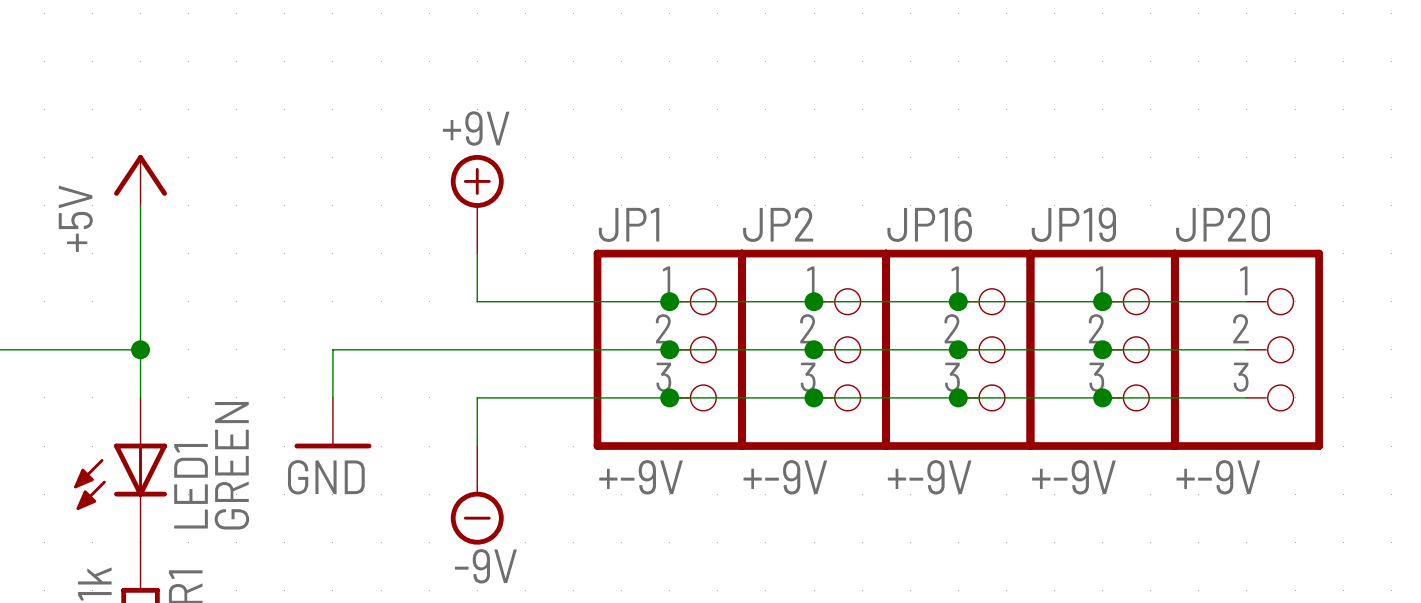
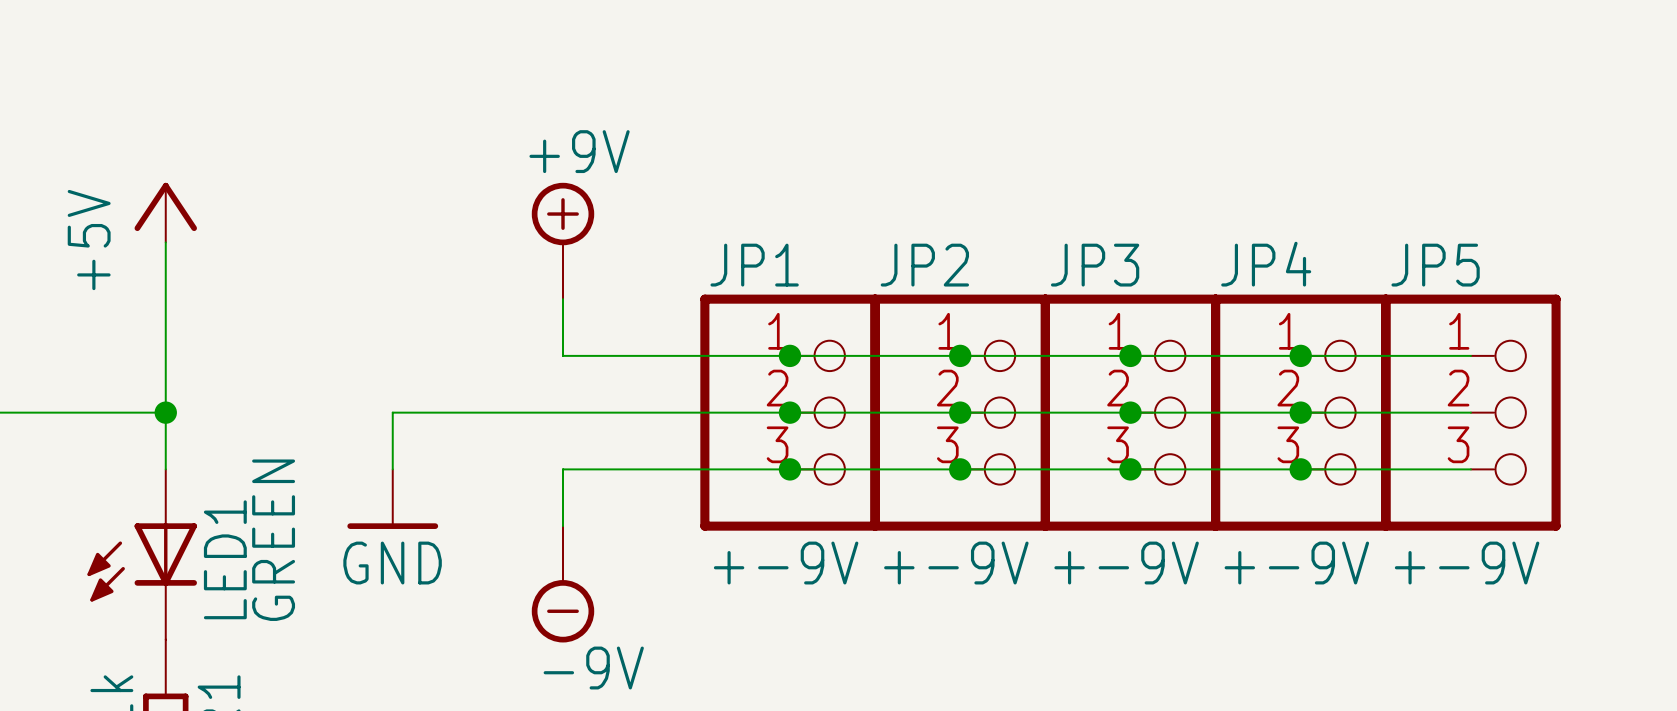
JP16 name: JP16 (929, 224) -> JP3 (1095, 265)
JP19 name: JP19 (1073, 224) -> JP4 (1266, 264)
JP20 name: JP20 (1223, 224) -> JP5 (1435, 265)

